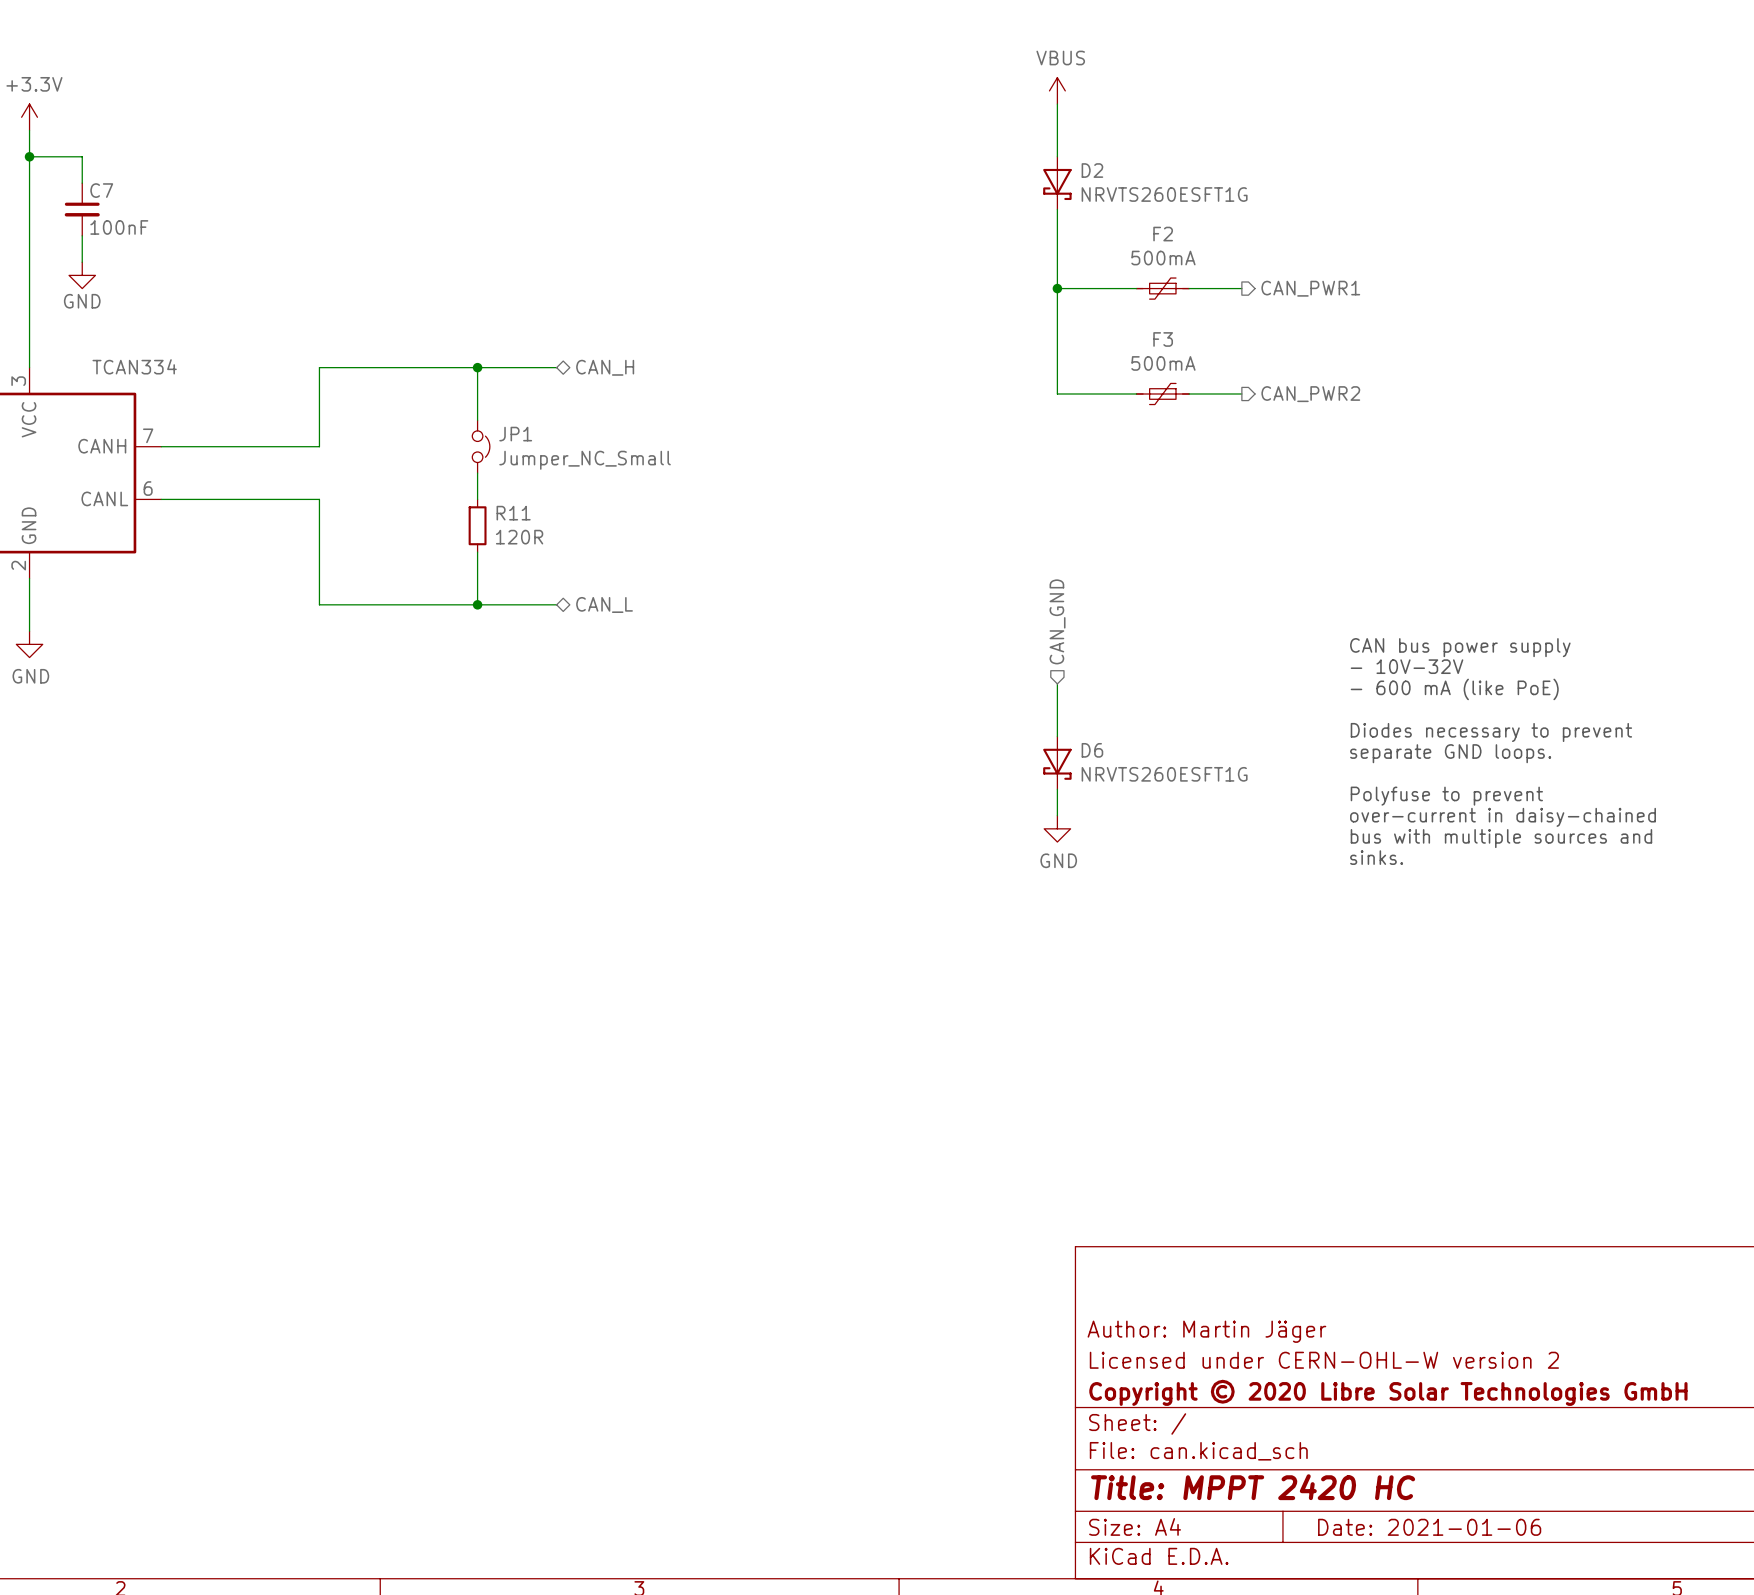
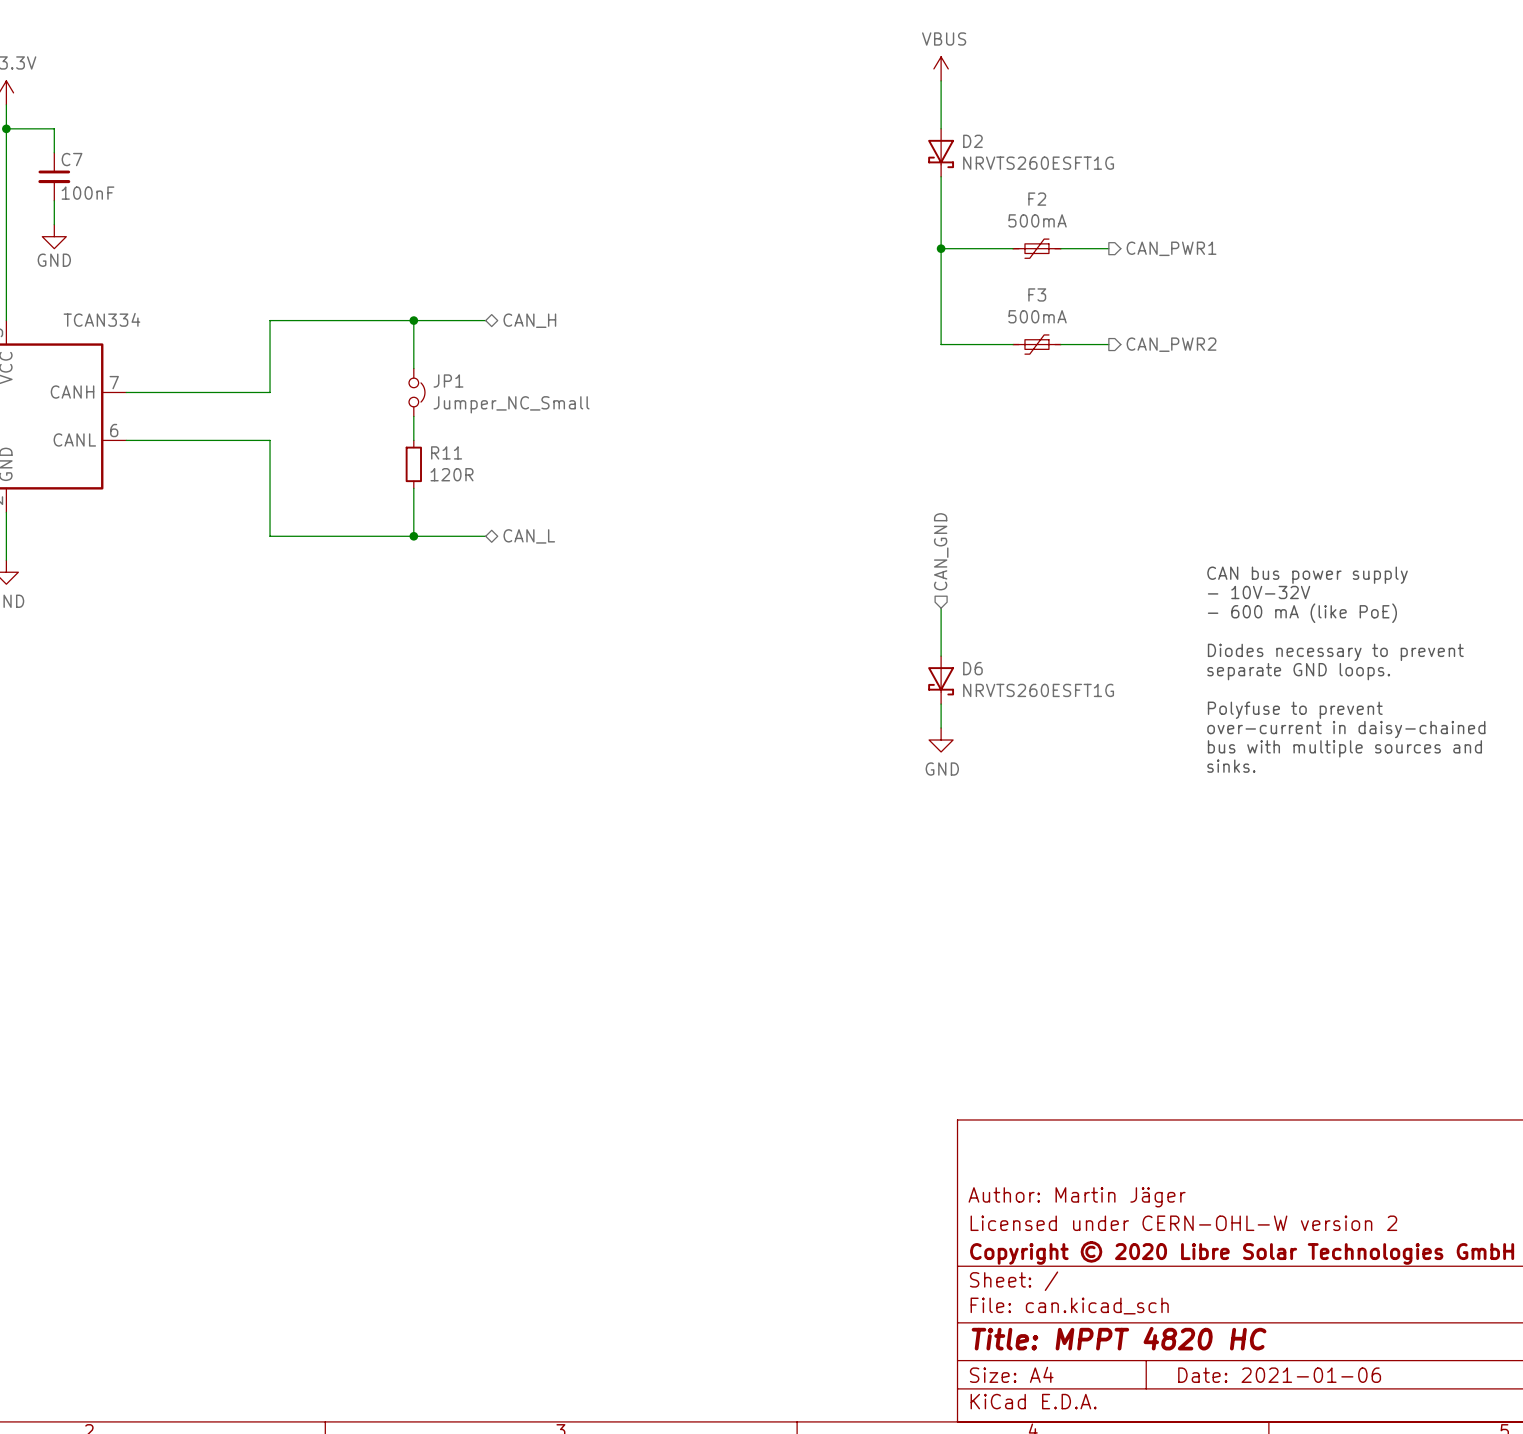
title block: Title: MPPT 2420 HC (1253, 1487) -> Title: MPPT 4820 HC (1119, 1338)

